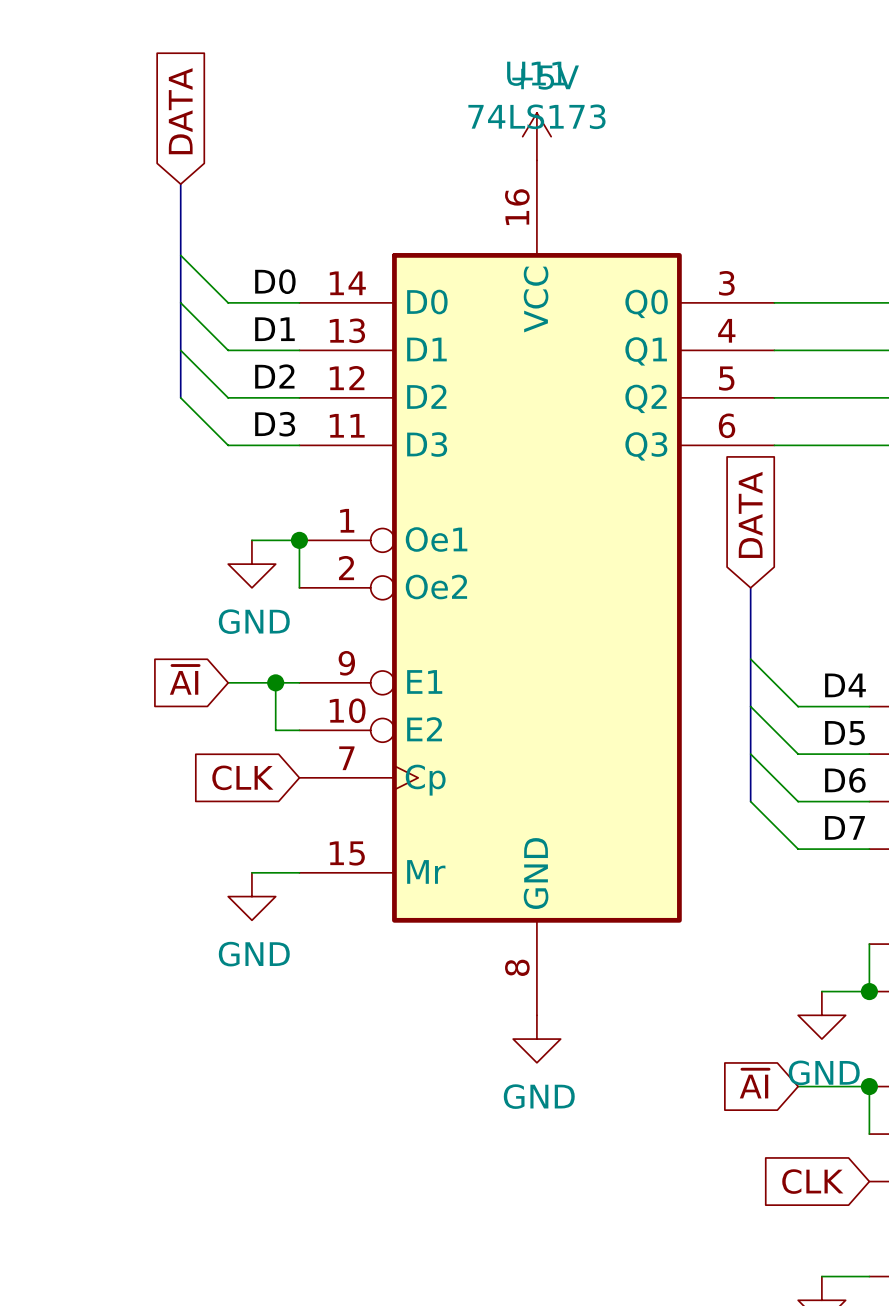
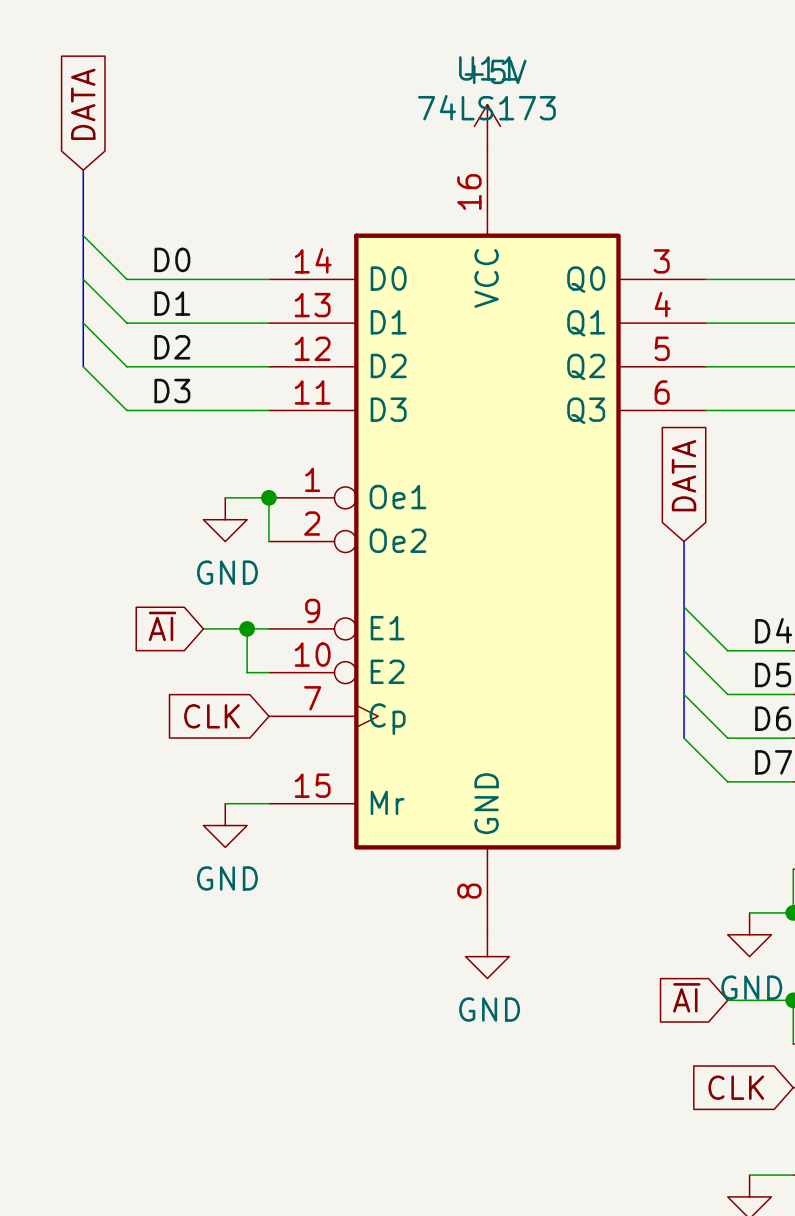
global label position: DATA (180, 111) -> DATA (83, 104)
bus: (180, 184) (180, 397) -> (83, 170) (83, 366)
wire: (180, 255) (228, 302) -> (83, 235) (126, 279) (203, 279)
label position: D0 (275, 281) -> D0 (172, 259)
wire: none -> (83, 279) (126, 323)
wire: (180, 302) (228, 350) -> (126, 323) (203, 323)
label position: D1 (274, 329) -> D1 (172, 303)
wire: (180, 350) (228, 397) -> (83, 323) (126, 366) (203, 366)
label position: D2 (274, 376) -> D2 (172, 347)
wire: none -> (83, 366) (126, 410)
wire: (180, 397) (228, 445) -> (126, 410) (203, 410)
label position: D3 (275, 424) -> D3 (172, 390)

